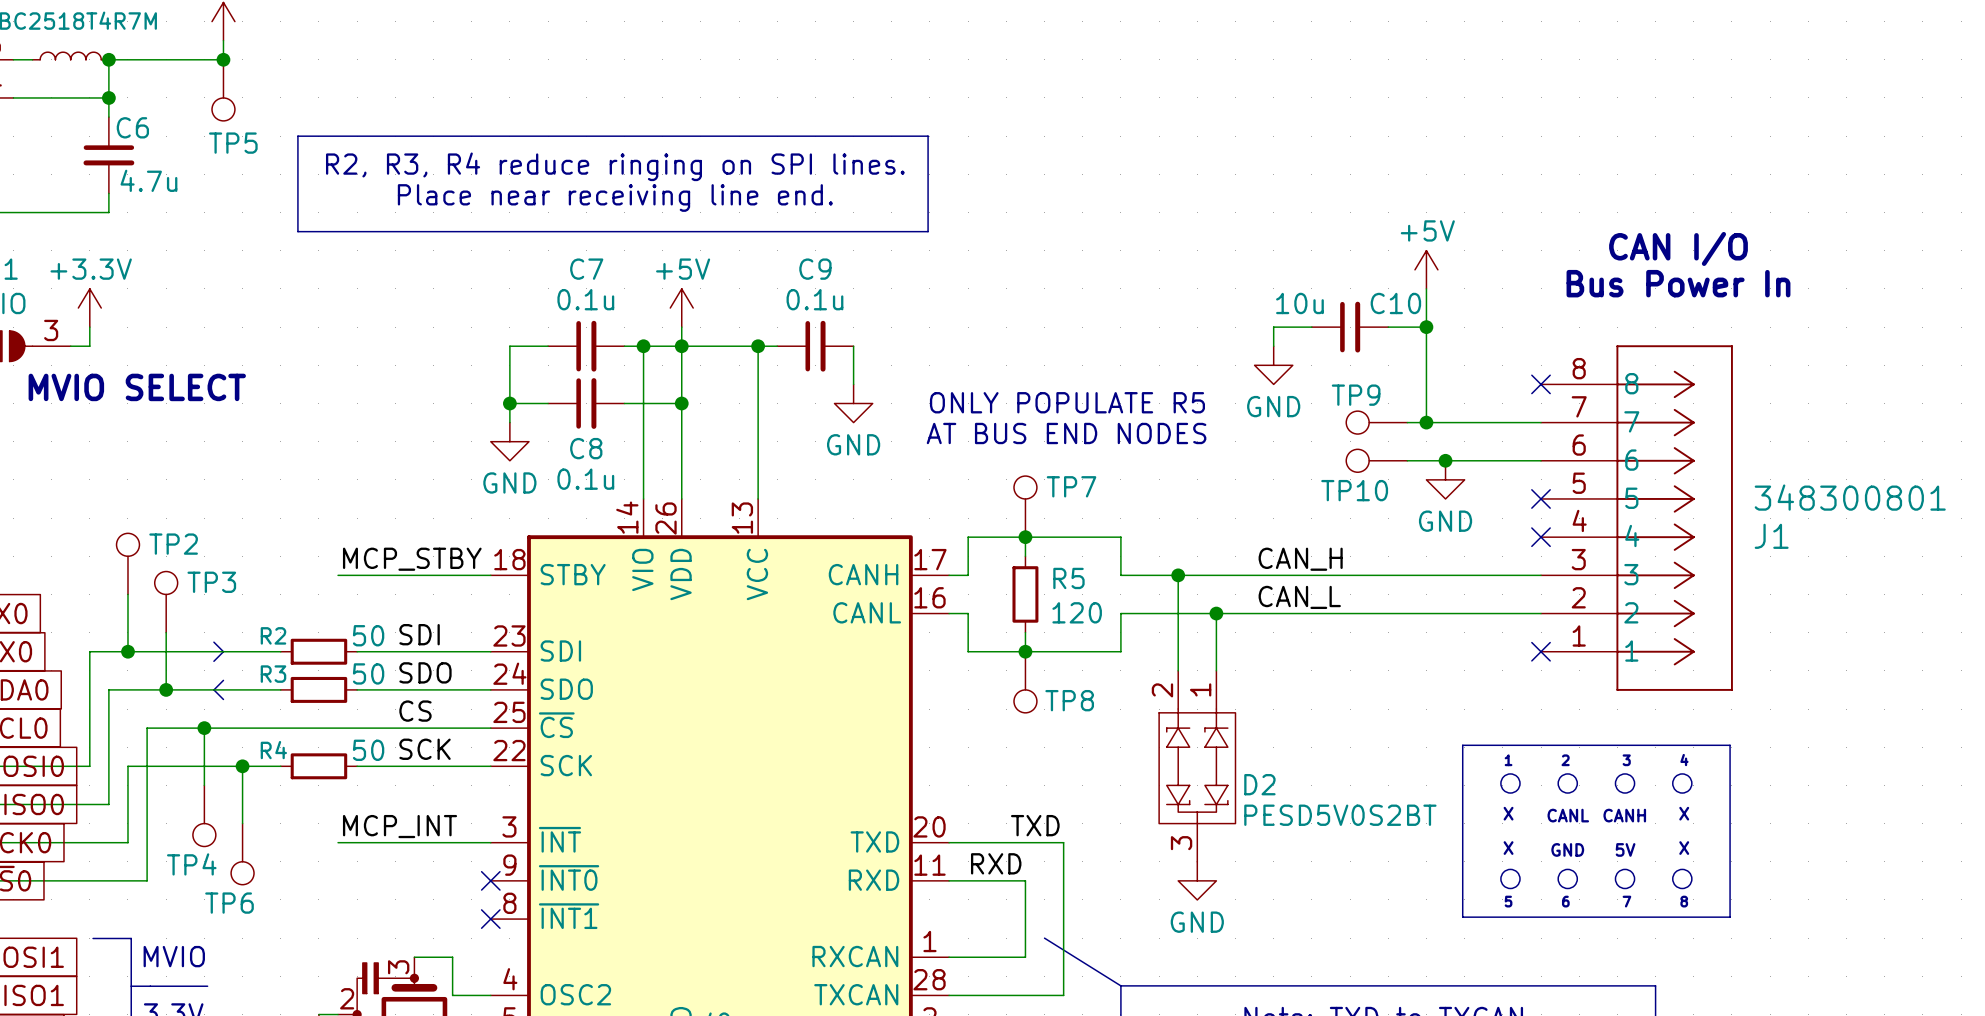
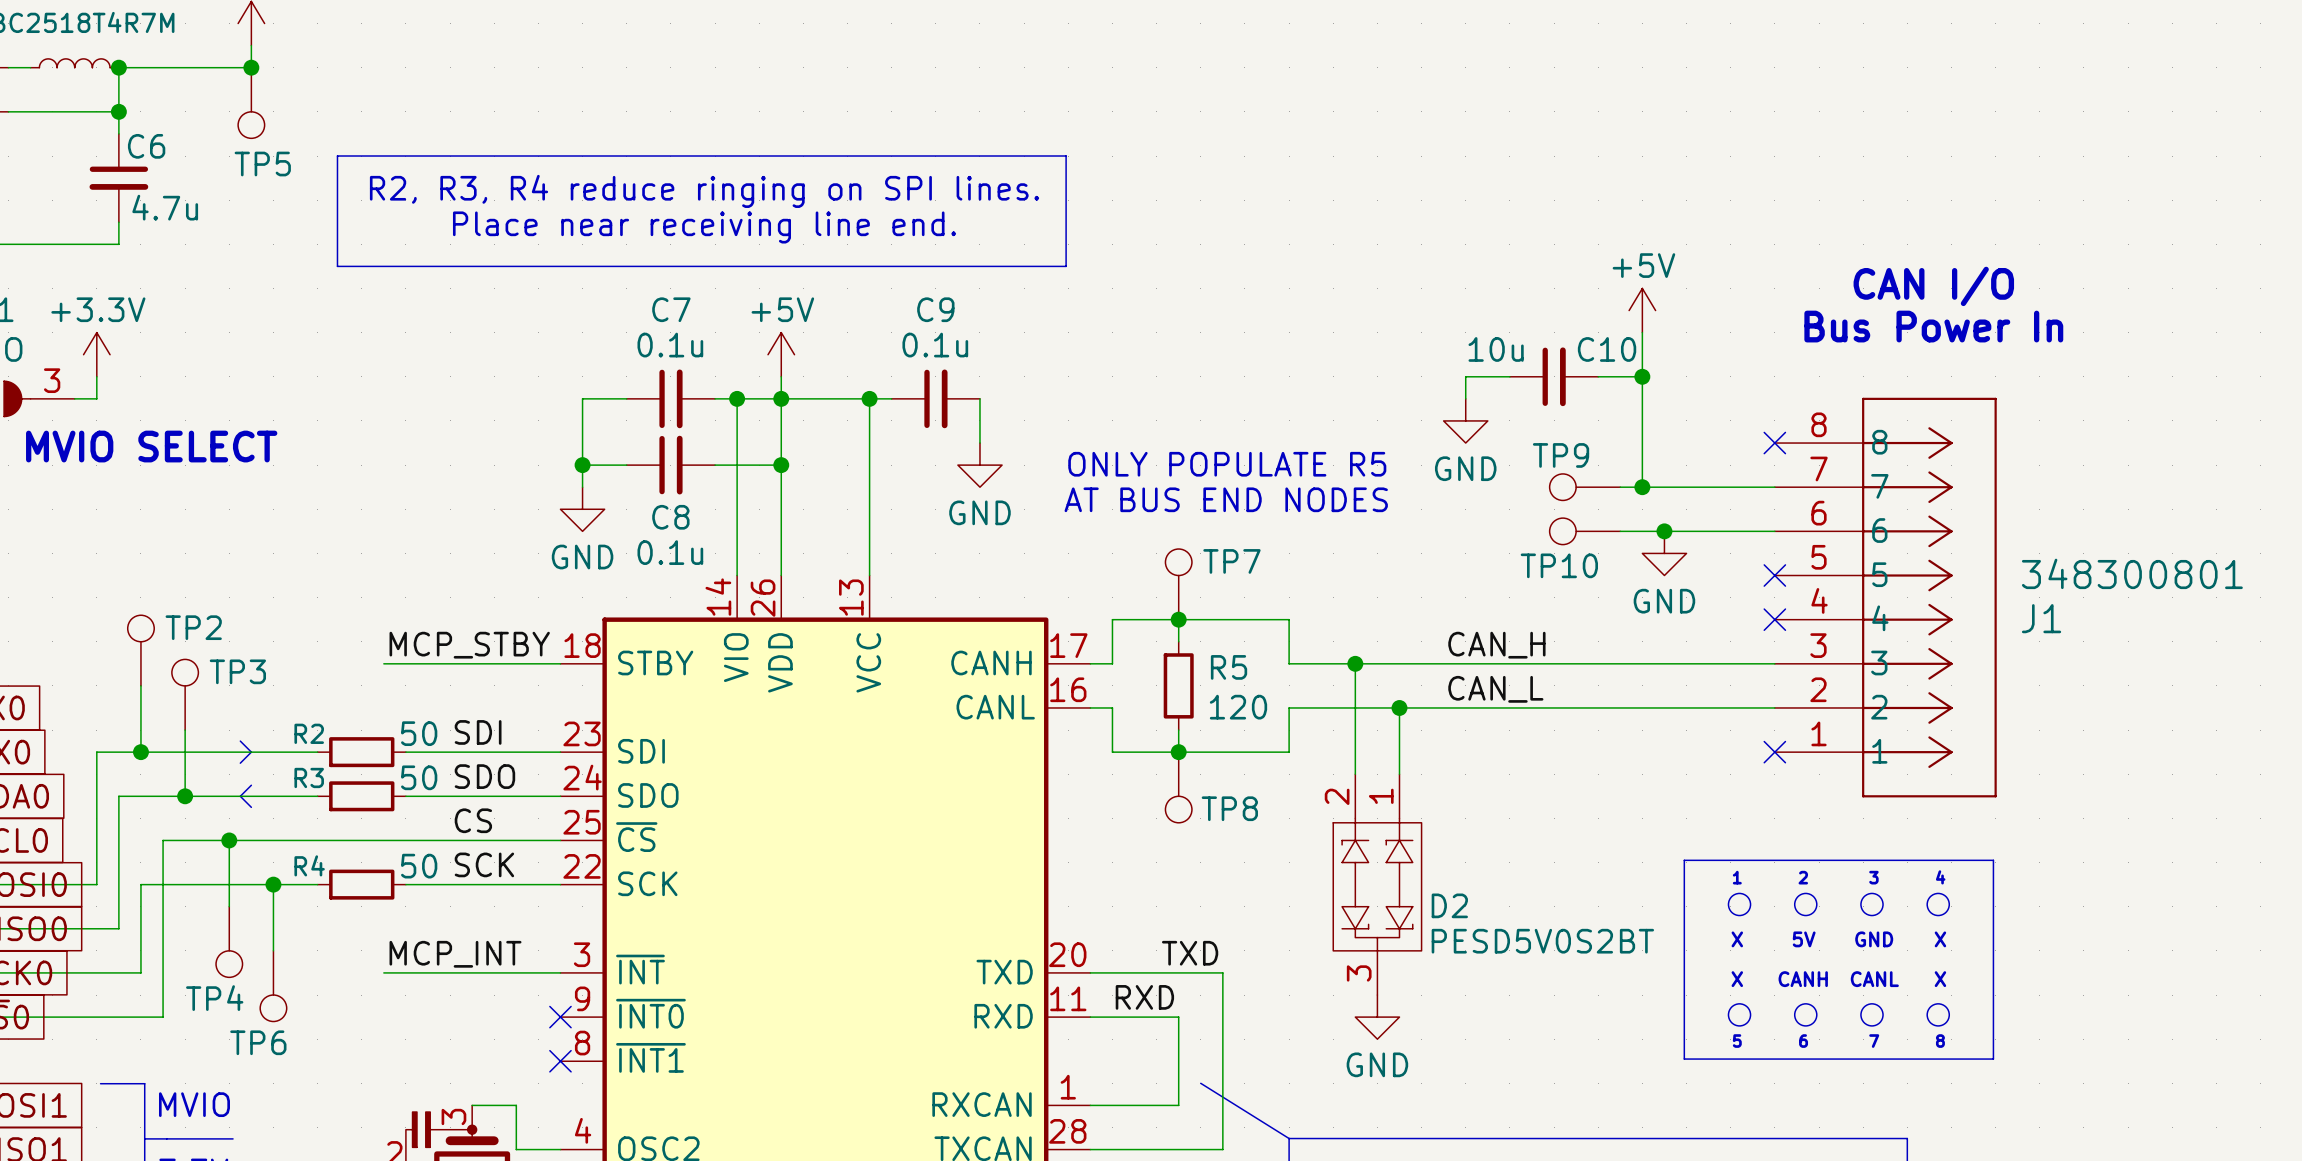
text position: CANL (1568, 815) -> CANL (1874, 979)
text position: CANH (1624, 815) -> CANH (1803, 979)
text position: GND (1567, 849) -> GND (1874, 939)
text position: 5V (1625, 849) -> 5V (1804, 939)

